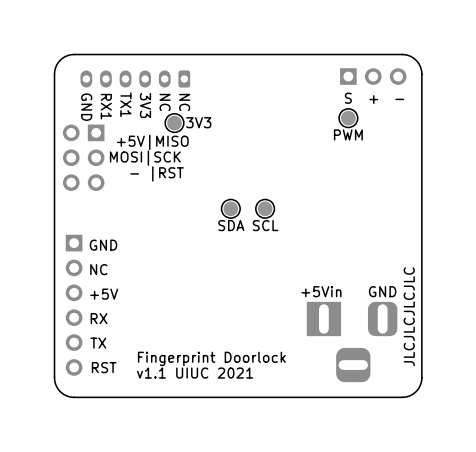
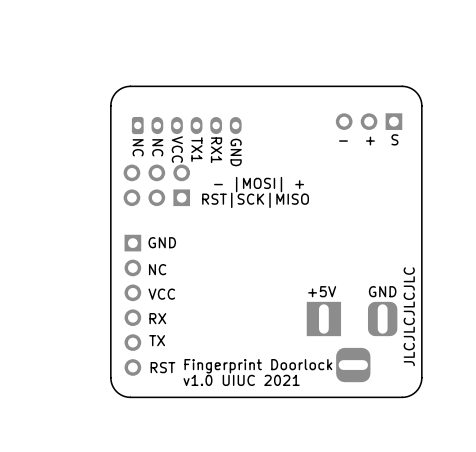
part rotation: 0° (373, 76) -> 180° (369, 121)
part position: (373, 76) -> (369, 121)
part rotation: 0° (135, 79) -> 180° (186, 125)
part position: (135, 79) -> (186, 125)
text position: S (348, 98) -> S (394, 139)
text position: + (373, 99) -> + (370, 141)
text position: - (399, 99) -> - (343, 141)
text: NC (165, 102) -> none
text: NC (184, 102) -> none
text position: TX1 (125, 104) -> TX1 (196, 149)
text: 3V3 (145, 105) -> none
board edge: (421, 105) (421, 69) (416, 60) (404, 54) (74, 54) (60, 60) (54, 74) (55, 382) (60, 391) (71, 397) (130, 397) -> (421, 105) (416, 92) (402, 86) (130, 86) (116, 92) (110, 105) (110, 377) (116, 391) (130, 397)
text position: RX1 (106, 106) -> RX1 (216, 150)
text: GND (86, 107) -> none
PWM: (348, 118) -> none
3V3: (174, 123) -> none
text: +5V|MISO (152, 142) -> none
text: none -> NC (138, 147)
text: none -> NC (157, 147)
text: none -> VCC (177, 149)
text: none -> GND (236, 152)
part rotation: 0° (83, 157) -> 90° clockwise (156, 185)
part position: (83, 157) -> (156, 185)
text: MOSI|SCK (145, 158) -> none
text: - |RST (157, 173) -> none
text: none -> - |MOSI| + (259, 184)
text: none -> RST|SCK|MISO (255, 200)
SDA: (230, 208) -> none
SCL: (265, 208) -> none
text position: GND (103, 245) -> GND (162, 242)
text position: NC (98, 269) -> NC (157, 269)
text: +5Vin (321, 291) -> +5V (322, 291)
text: +5V (104, 294) -> none
text: none -> VCC (161, 294)
part position: (74, 305) -> (132, 305)
text position: RX (99, 318) -> RX (157, 318)
text position: TX (98, 343) -> TX (157, 340)
text position: Fingerprint Doorlock (211, 358) -> Fingerprint Doorlock (258, 366)
text position: RST (104, 367) -> RST (162, 367)
text: v1.1 UIUC 2021 (195, 373) -> v1.0 UIUC 2021 (241, 380)

